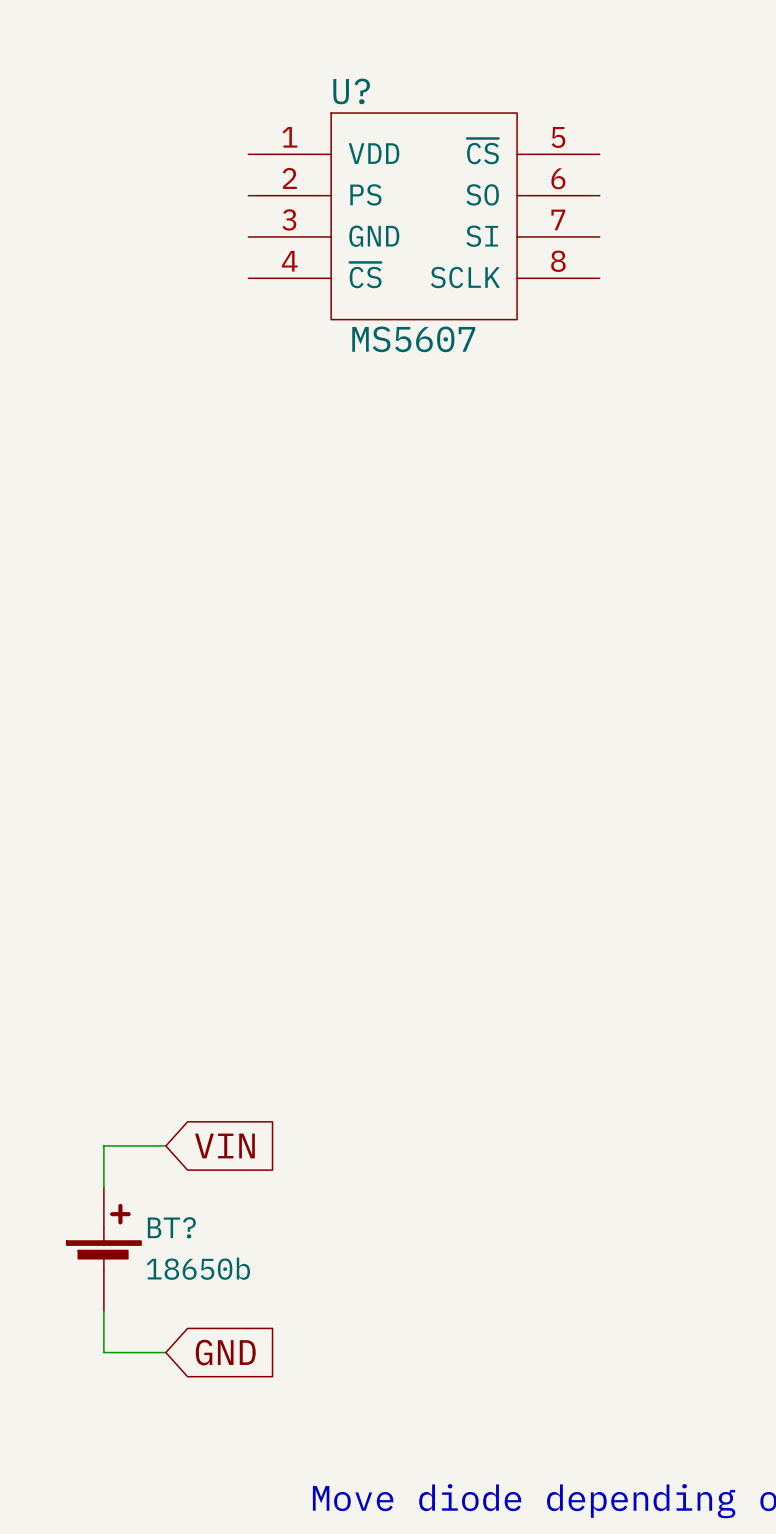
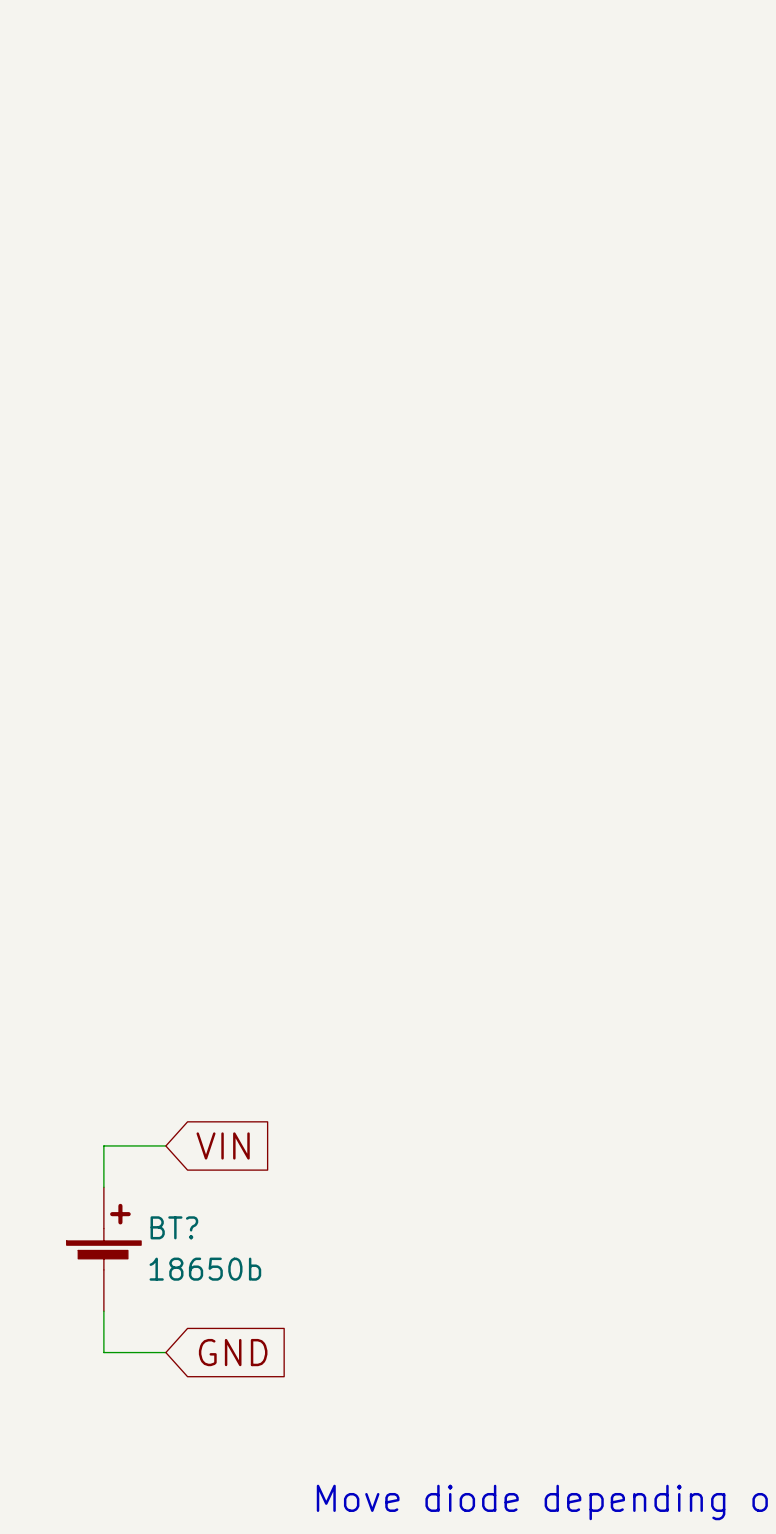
U?: MS5607 (424, 216) -> none

